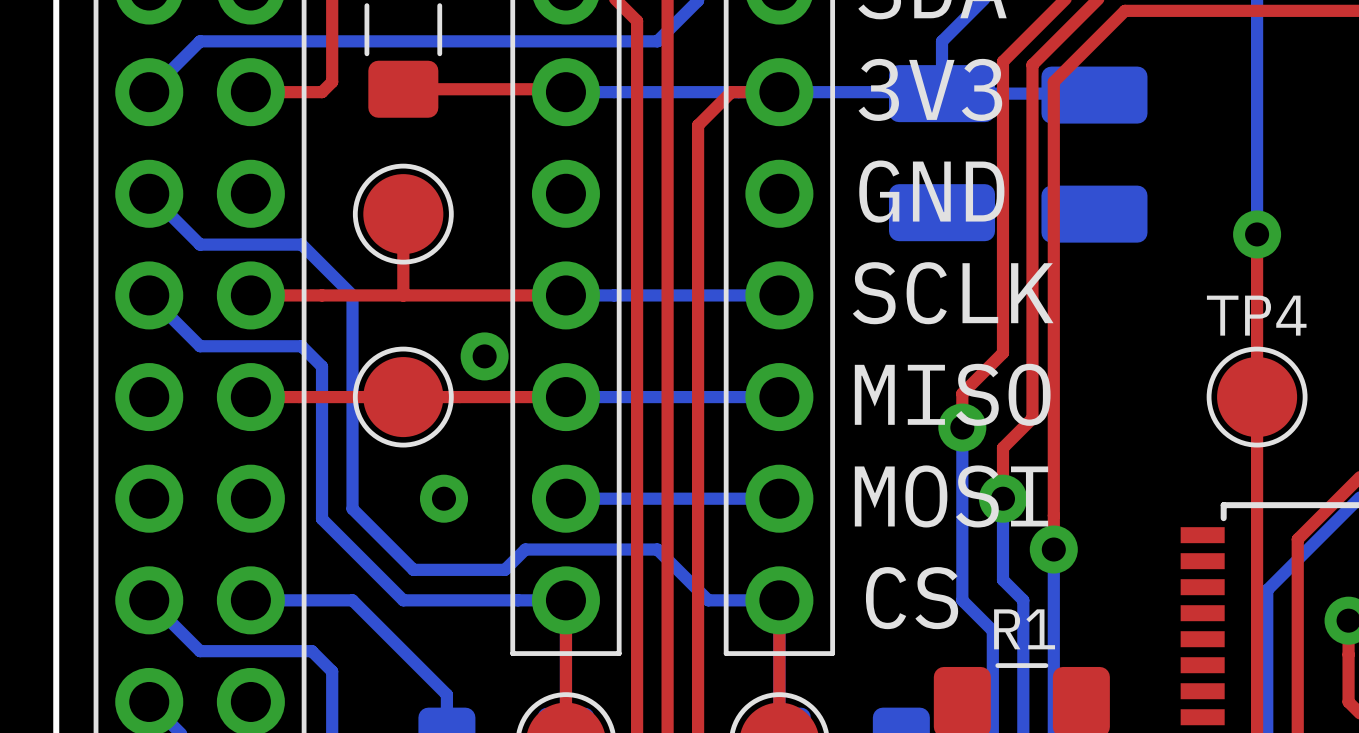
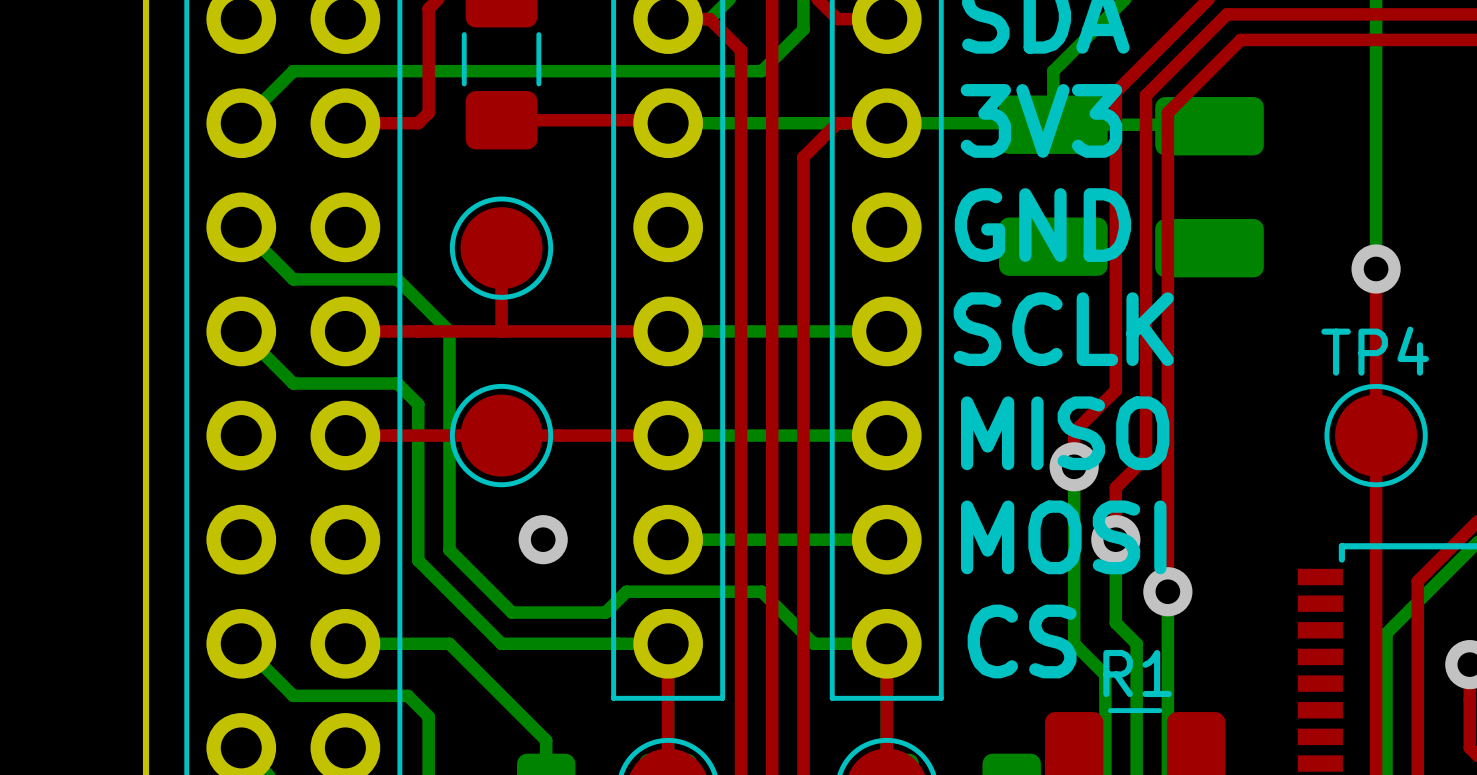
via: (484, 356) -> none

